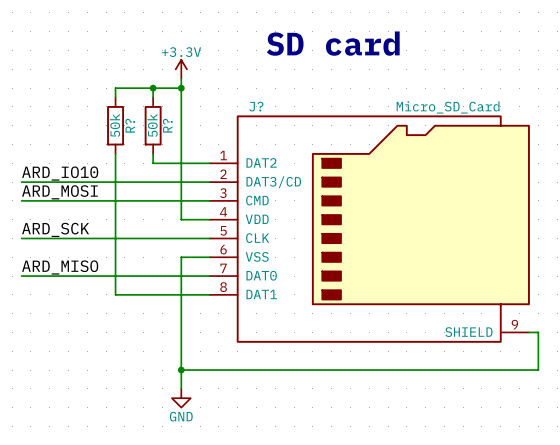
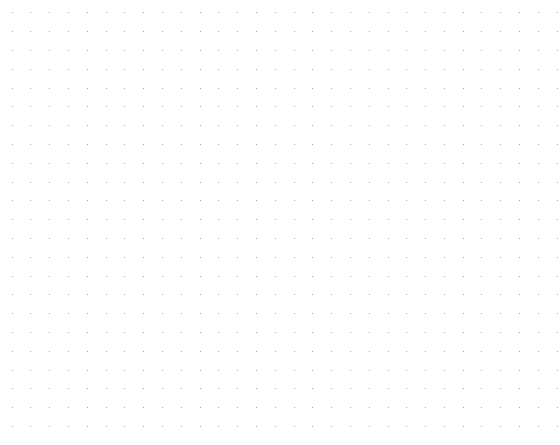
text: SD card (333, 43) -> none
power symbol: +3.3V (181, 69) -> none
wire: (181, 78) (181, 219) (209, 219) -> none
wire: (153, 88) (153, 97) -> none
junction: (153, 88) -> none
wire: (181, 88) (115, 88) (115, 97) -> none
junction: (181, 88) -> none
R?: 50k (115, 125) -> none
R?: 50k (153, 125) -> none
wire: (115, 153) (115, 294) (209, 294) -> none
wire: (153, 153) (153, 163) (209, 163) -> none
label: ARD_IO10 (60, 173) -> none
wire: (21, 182) (209, 182) -> none
label: ARD_MOSI (59, 192) -> none
wire: (21, 200) (209, 200) -> none
label: ARD_SCK (55, 229) -> none
J?: Micro_SD_Card (369, 229) -> none
wire: (21, 238) (209, 238) -> none
wire: (209, 257) (181, 257) (181, 388) -> none
label: ARD_MISO (60, 267) -> none
wire: (21, 276) (209, 276) -> none
wire: (528, 332) (538, 332) (538, 370) (181, 370) -> none
junction: (181, 370) -> none
power symbol: GND (181, 398) -> none

